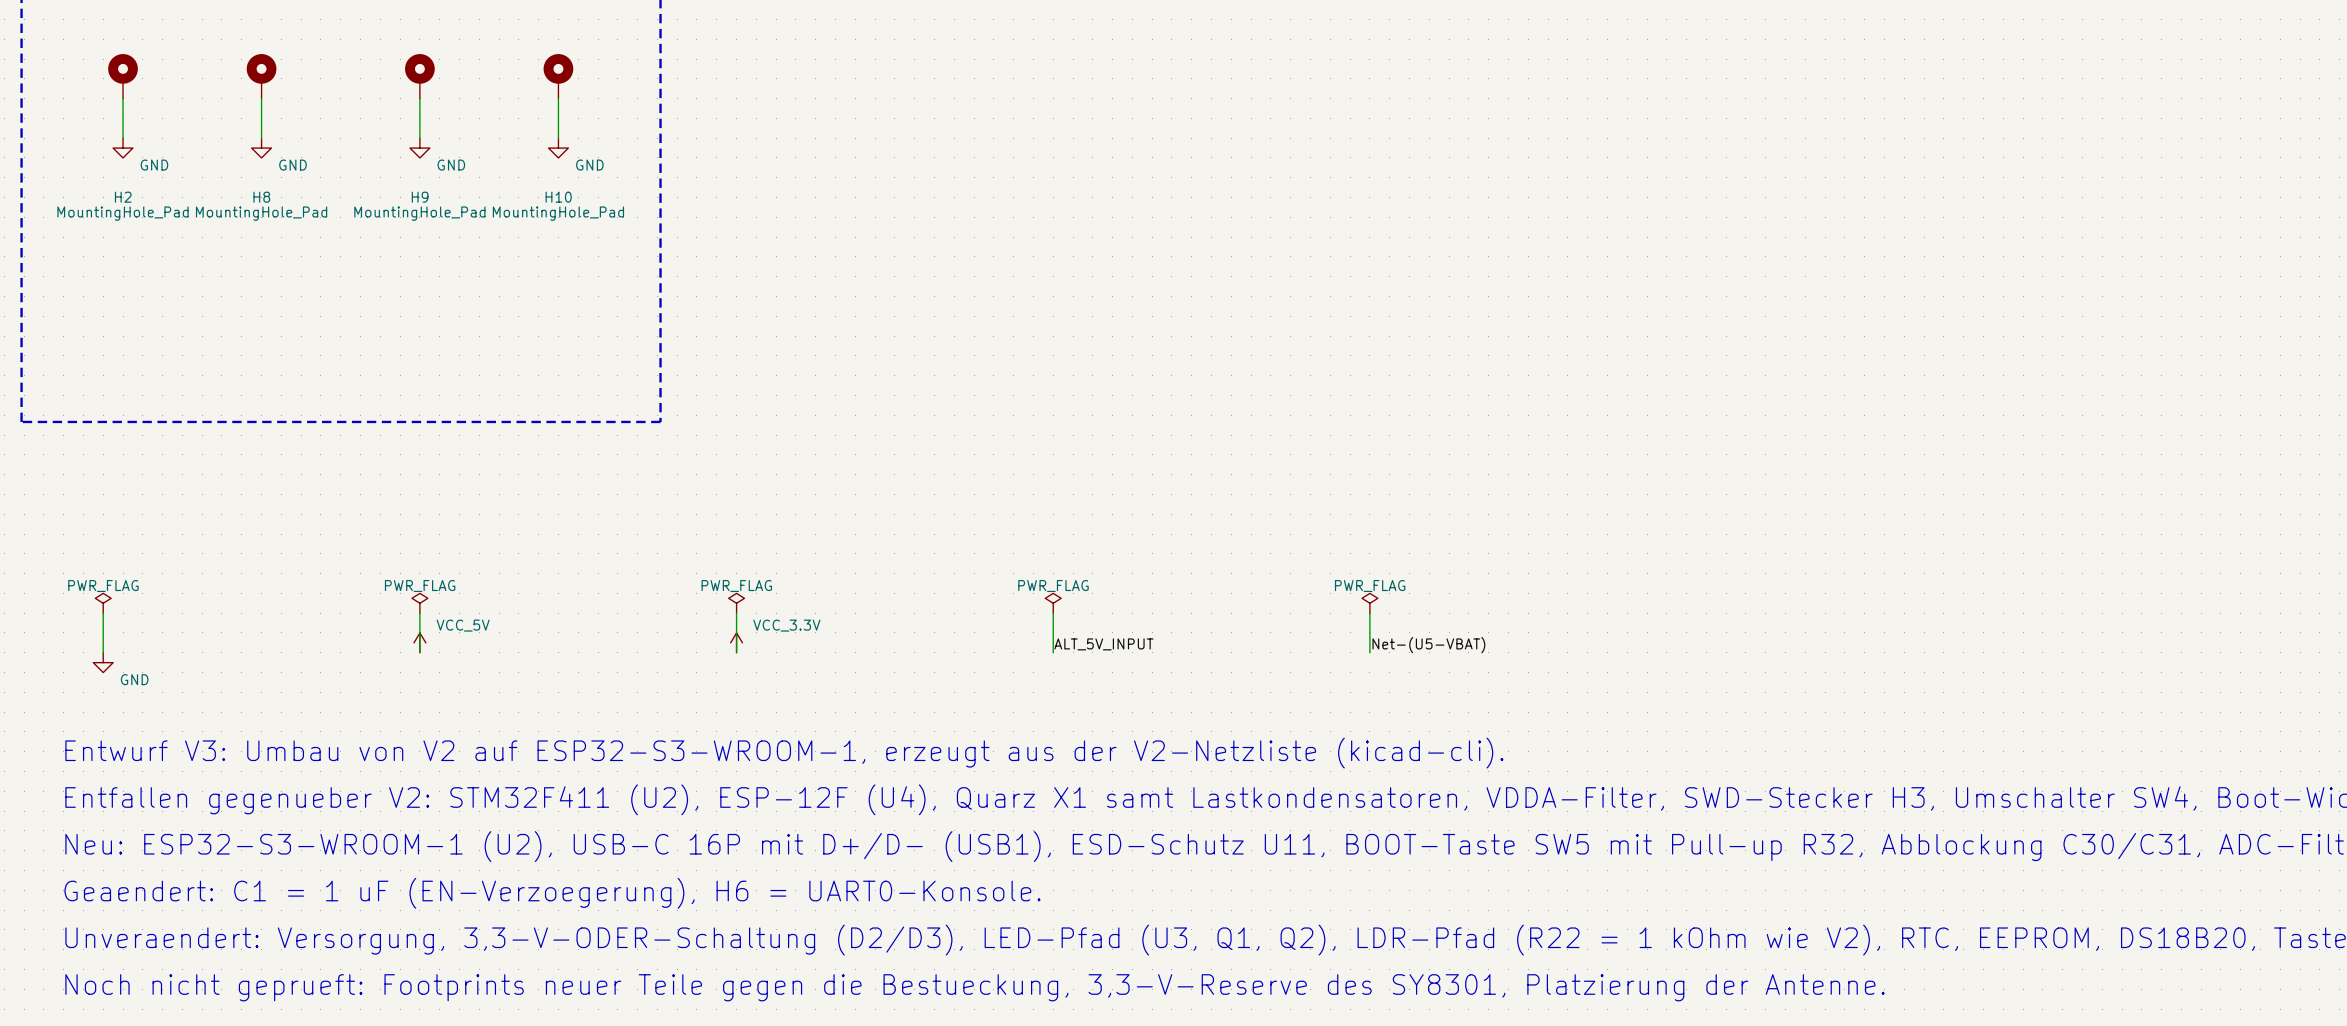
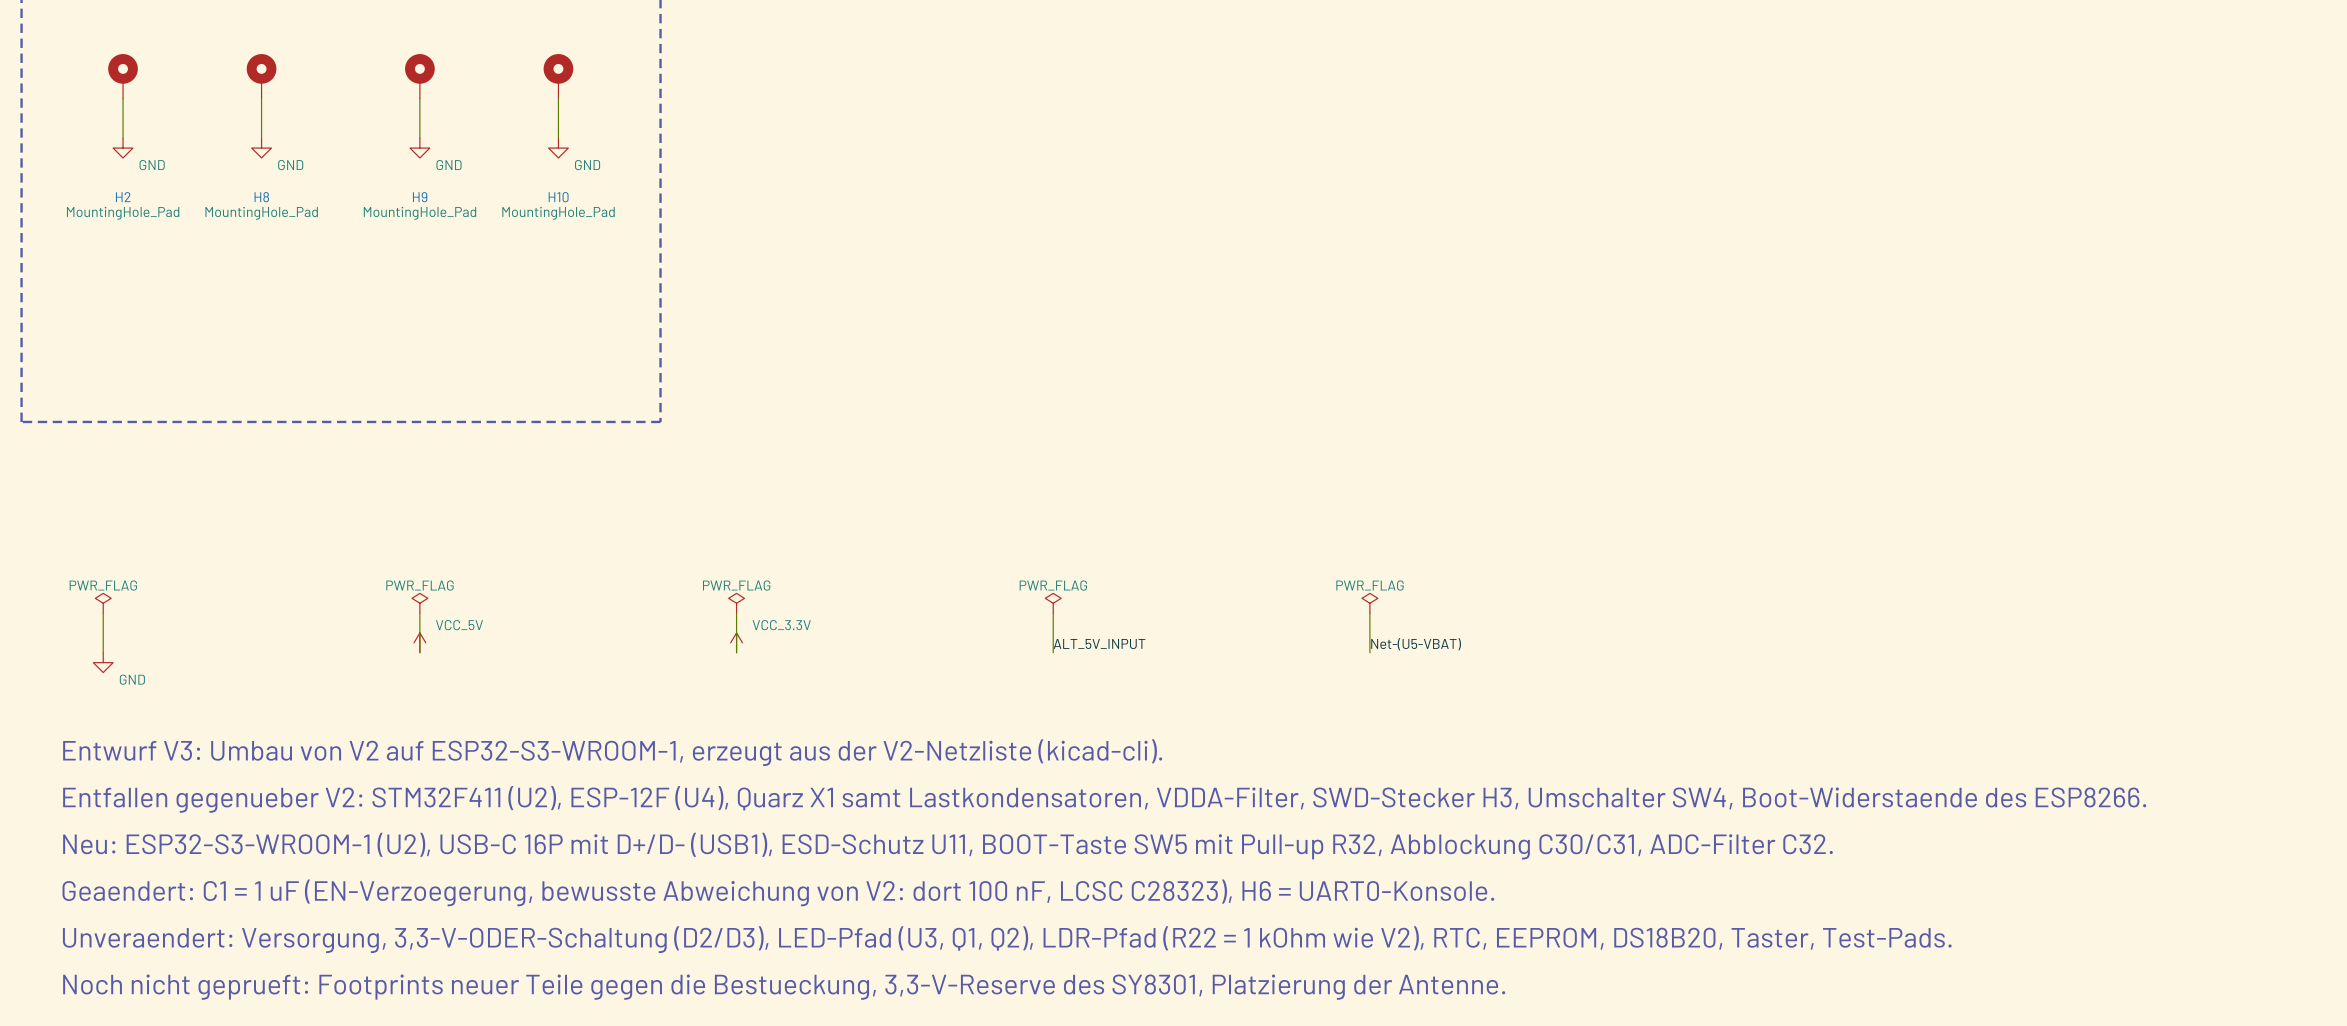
text: Geaendert: C1 = 1 uF (EN-Verzoegerung), H6 = UART0-Konsole. (552, 893) -> Geaendert: C1 = 1 uF (EN-Verzoegerung, bewusste Abweichung von V2: dort 100 nF, LCSC C28323), H6 = UART0-Konsole. (778, 892)

